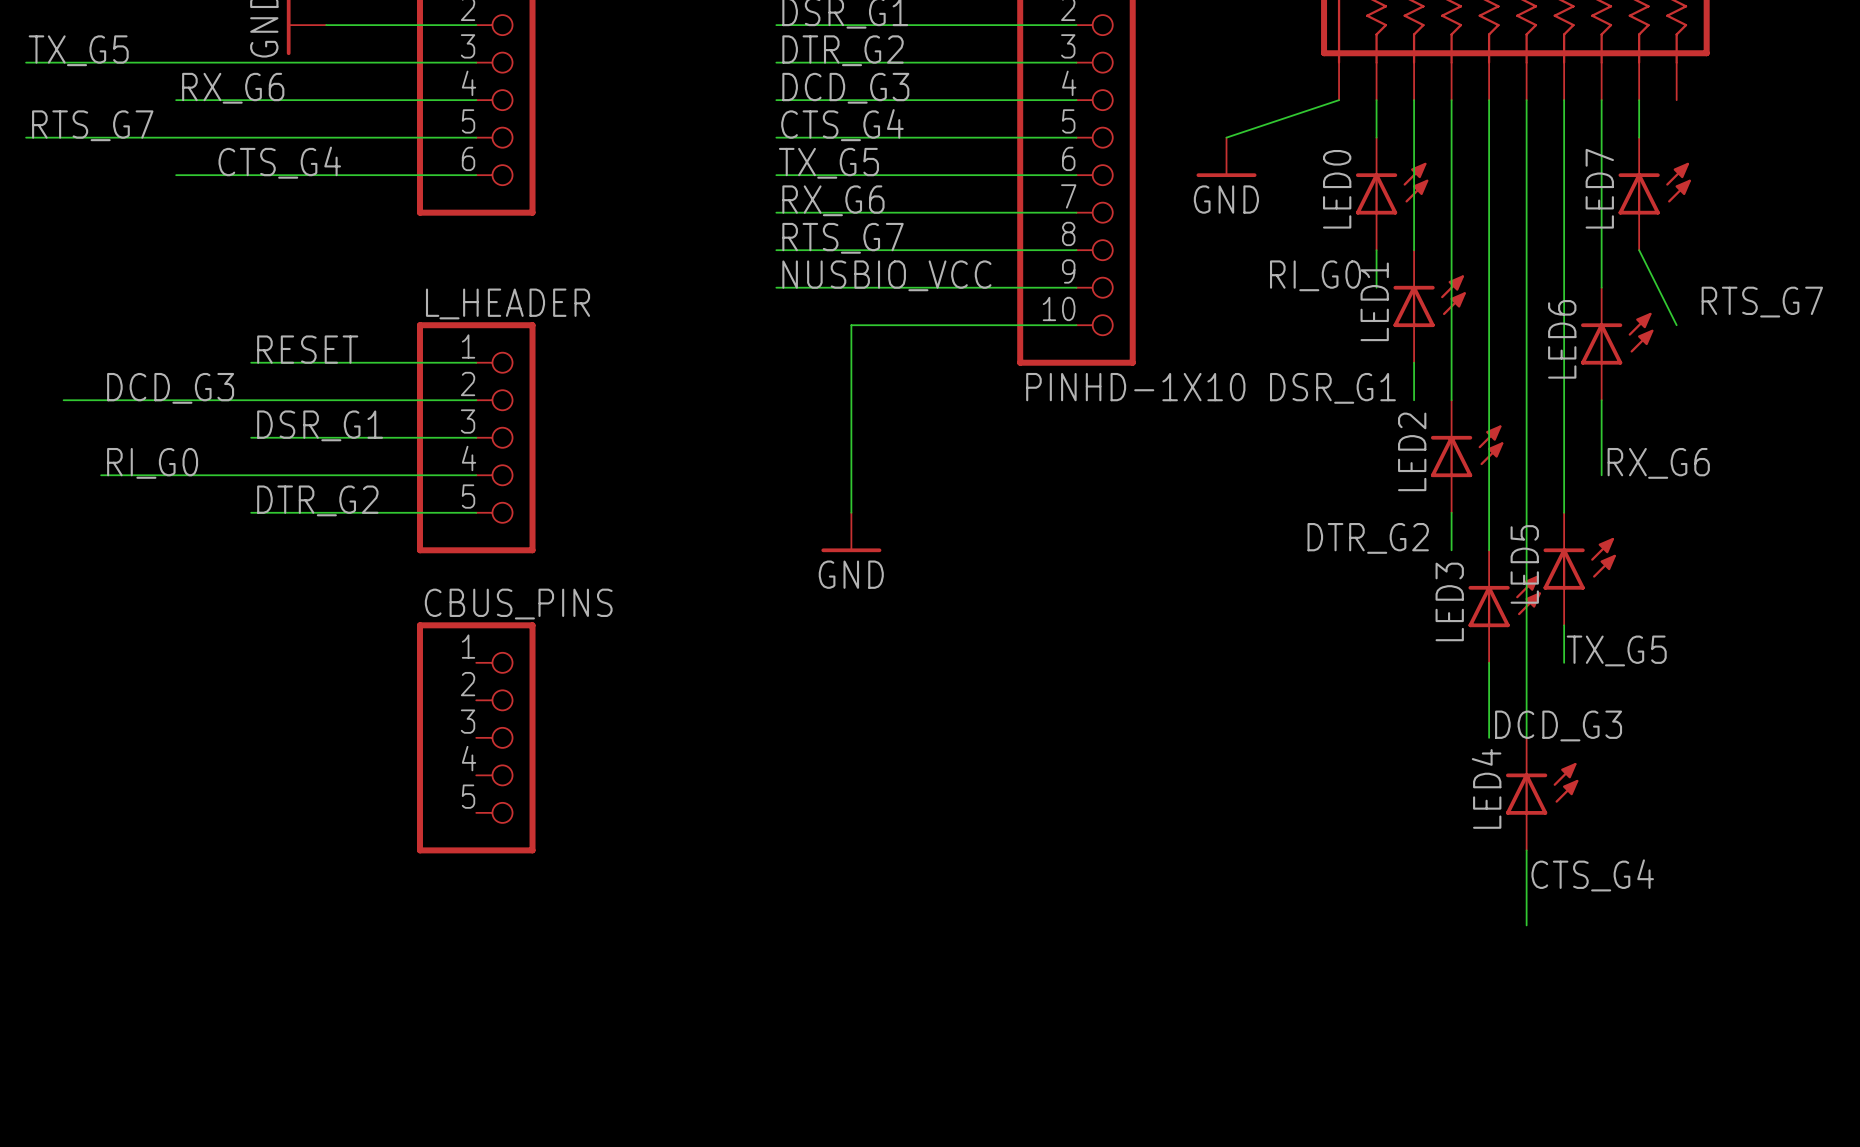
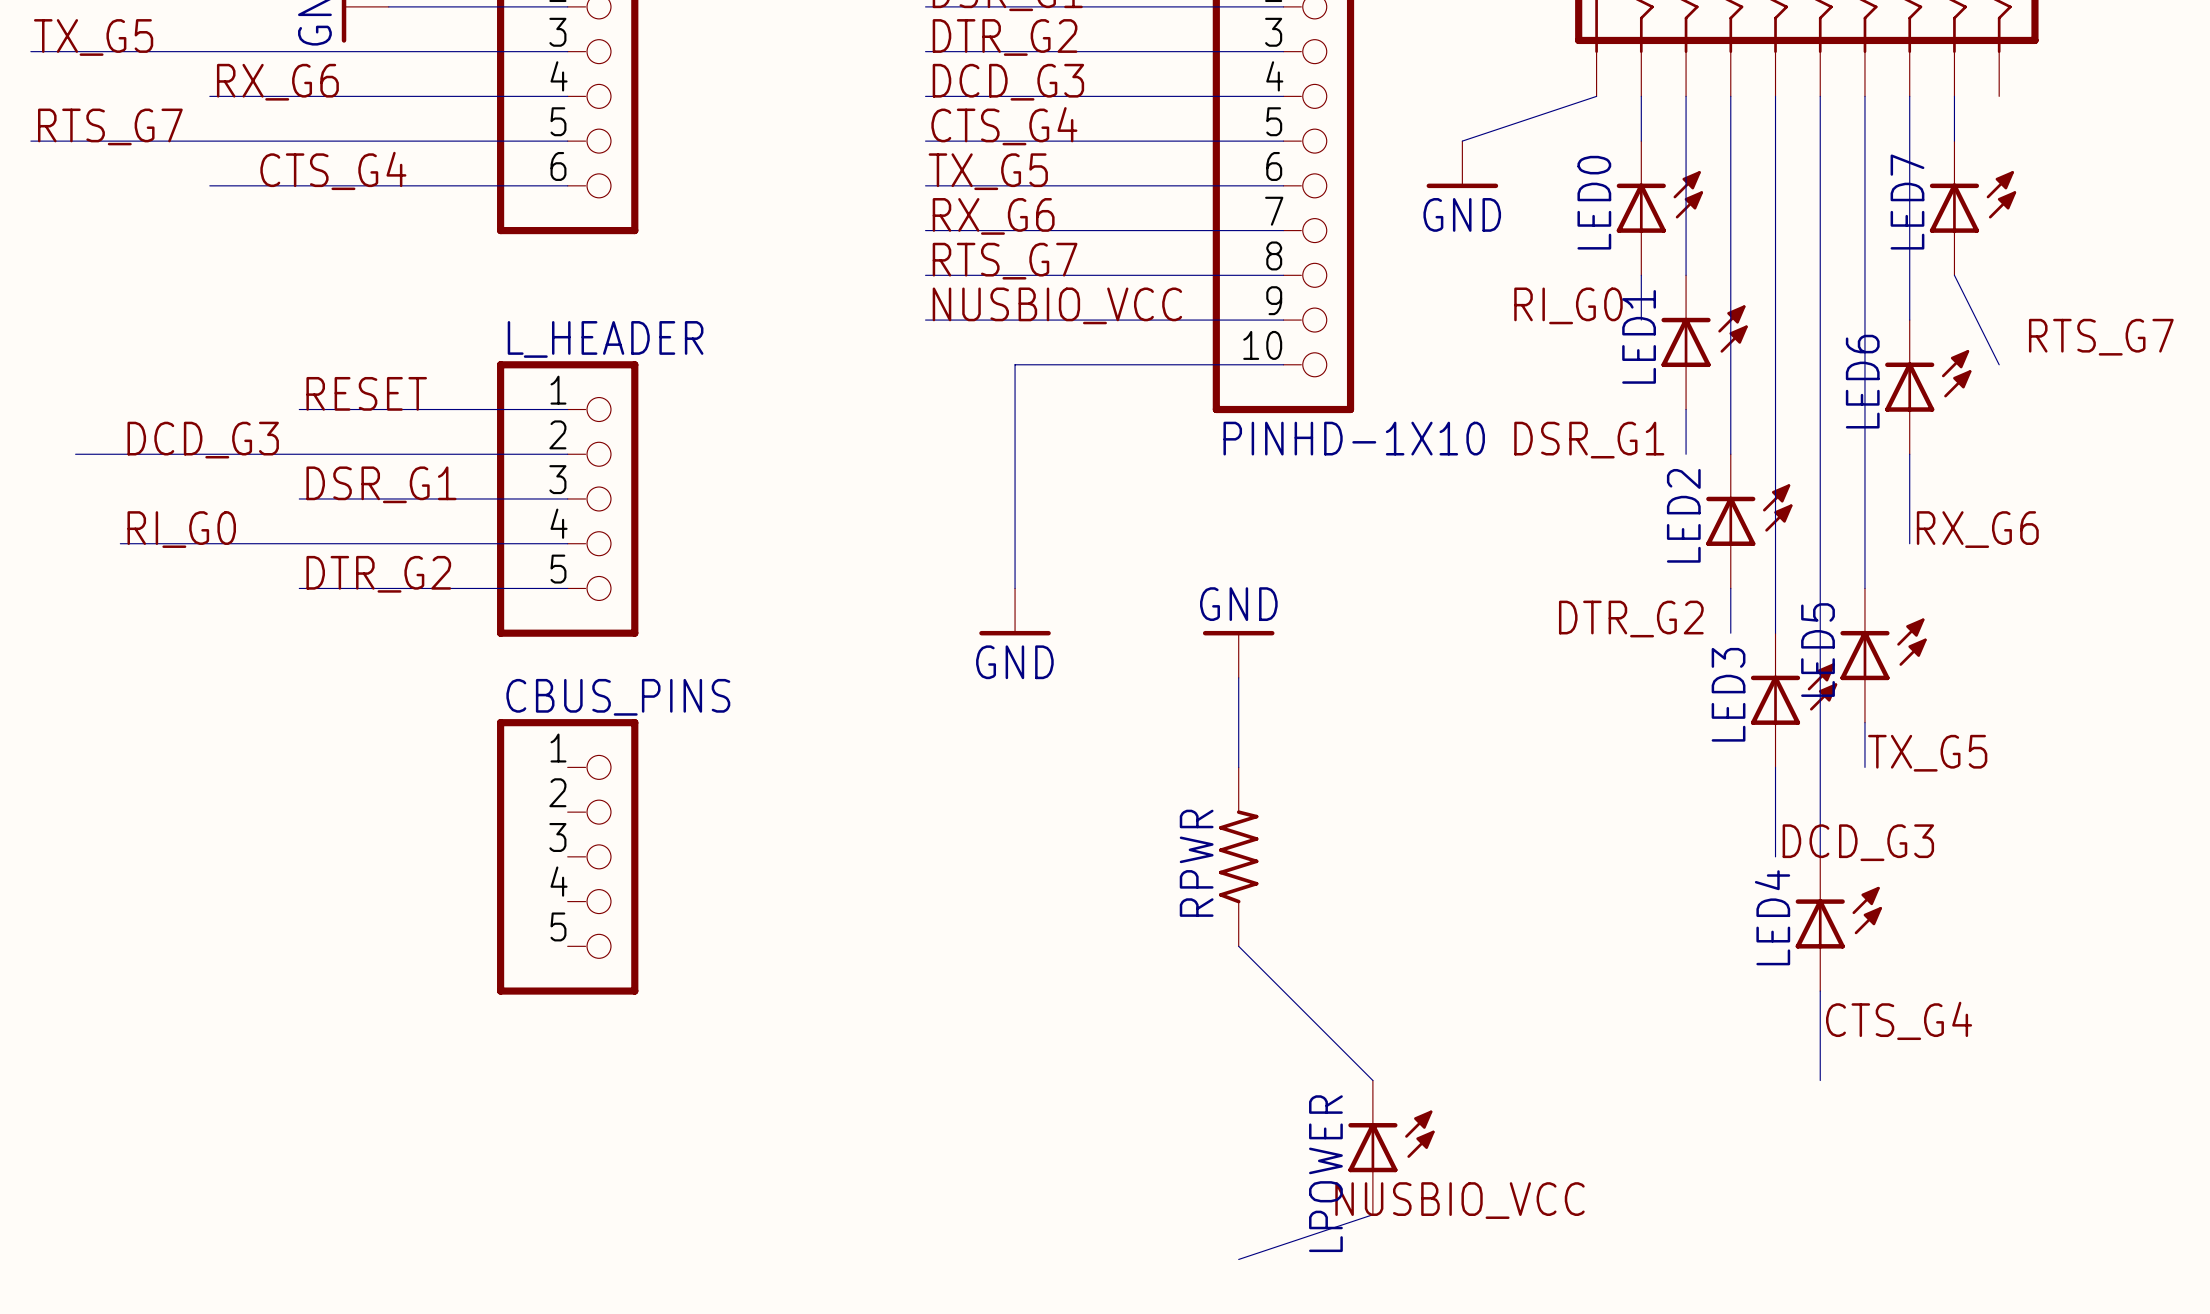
power symbol: none -> GND (1238, 654)
wire: none -> (1238, 677) (1238, 767)
RPWR: none -> (1238, 856)
wire: none -> (1238, 946) (1372, 1080)
LPOWER: none -> (1391, 1147)
label: none -> NUSBIO_VCC (1459, 1200)
wire: none -> (1372, 1214) (1238, 1259)

